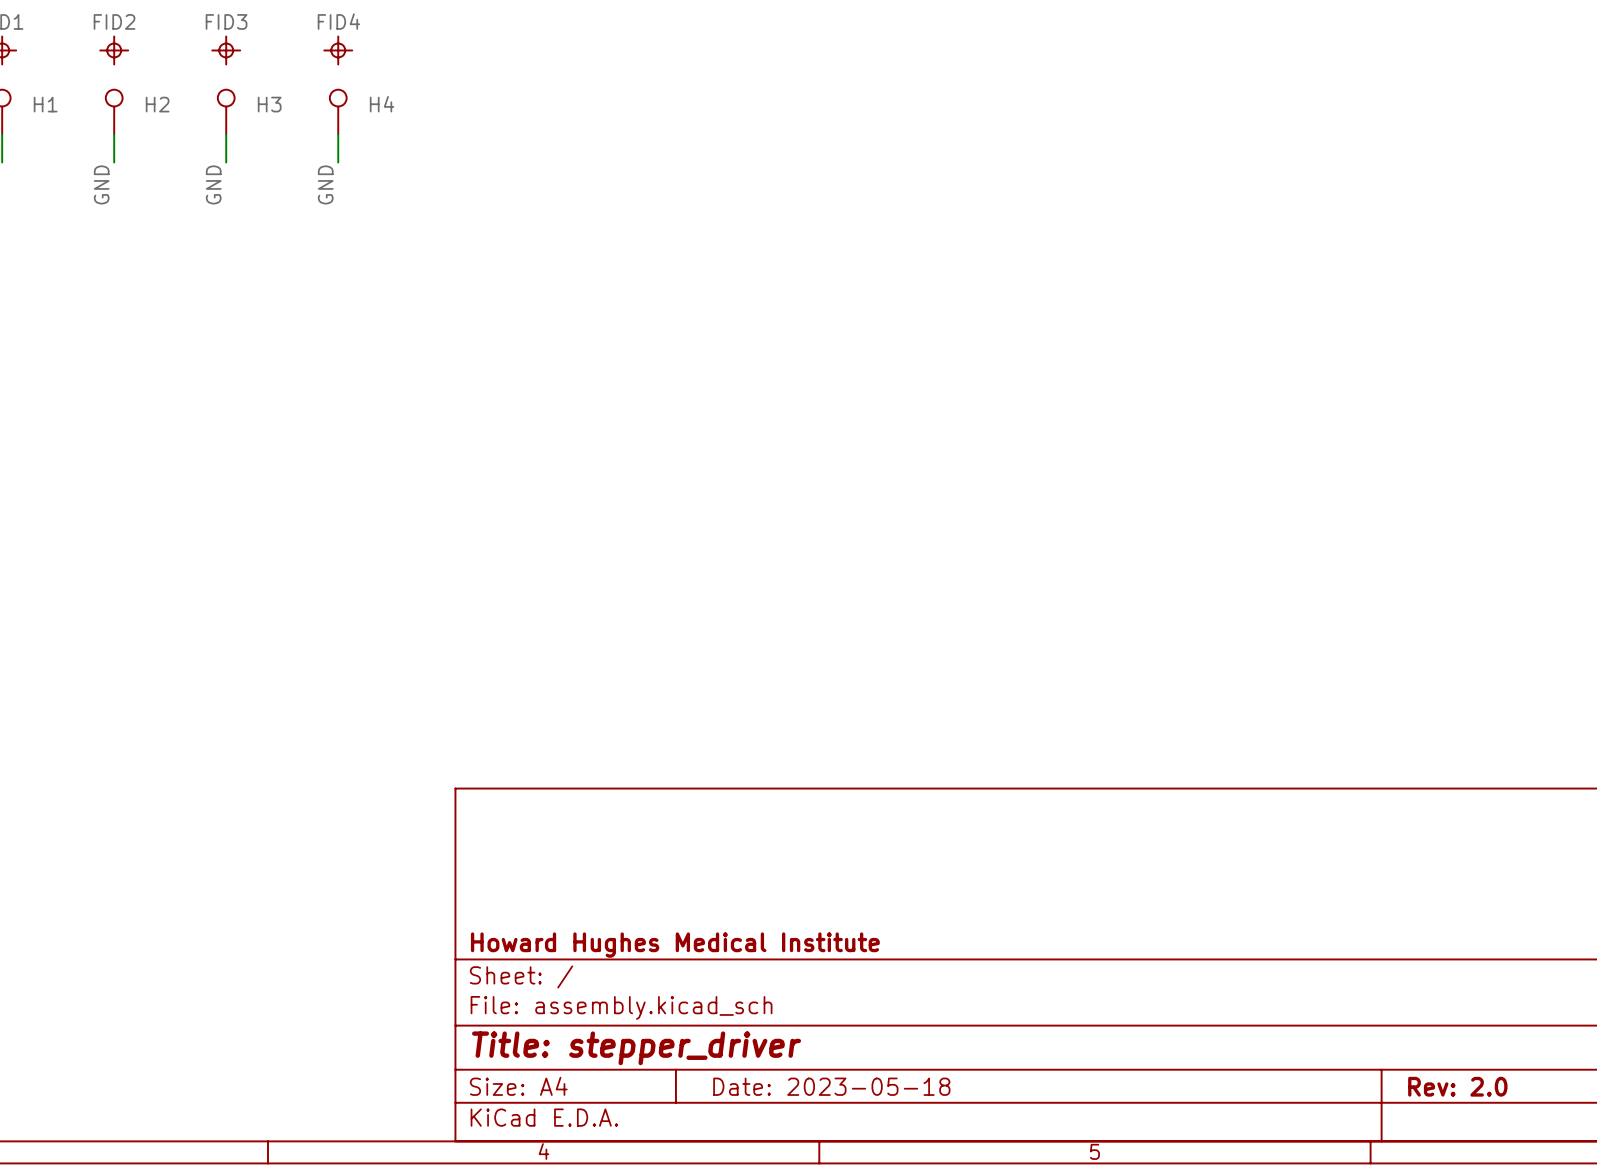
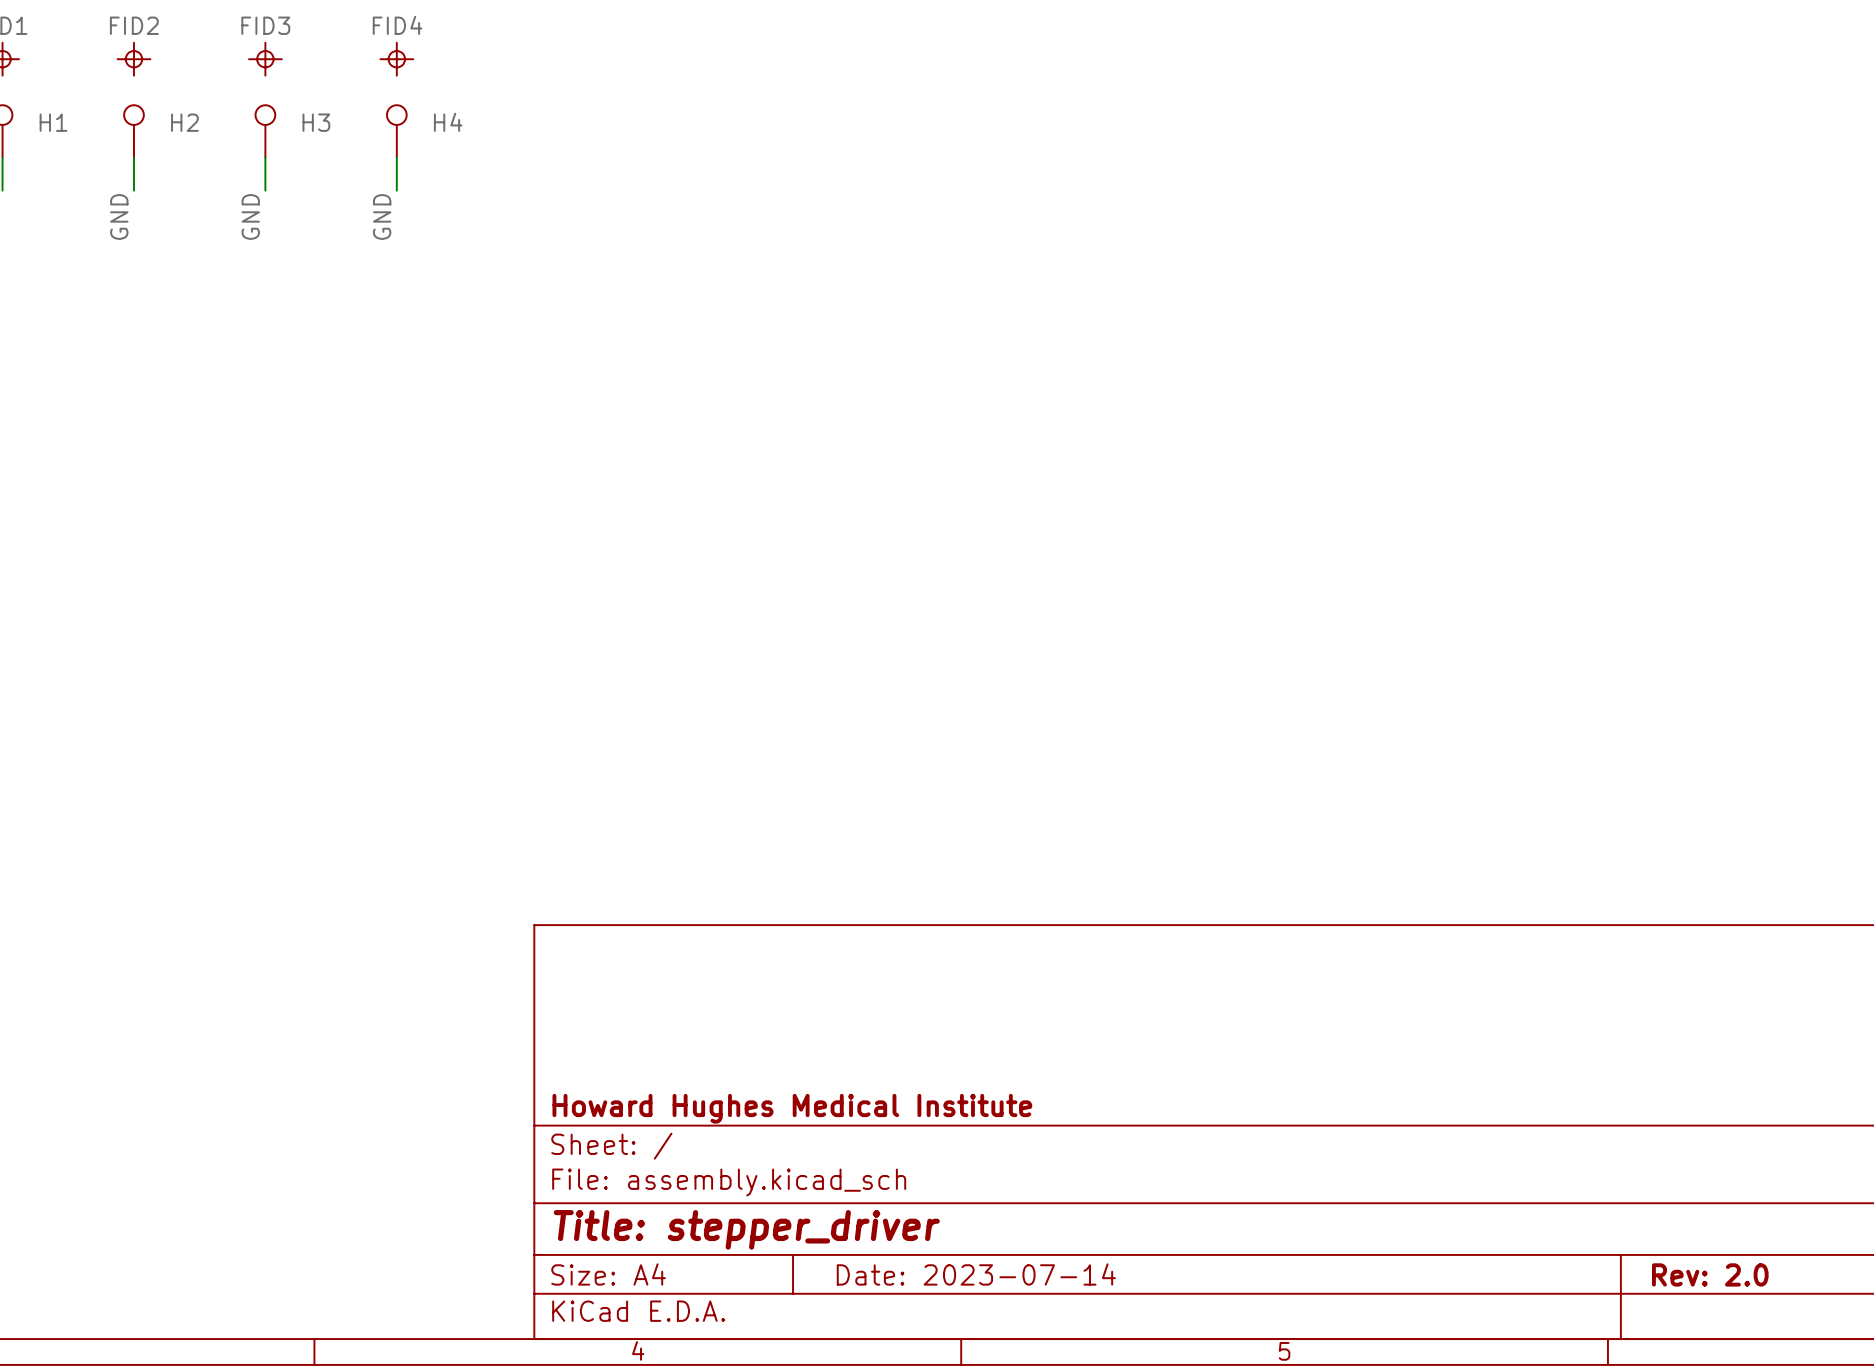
title block: Date: 2023-05-18 (831, 1086) -> Date: 2023-07-14 (976, 1274)

